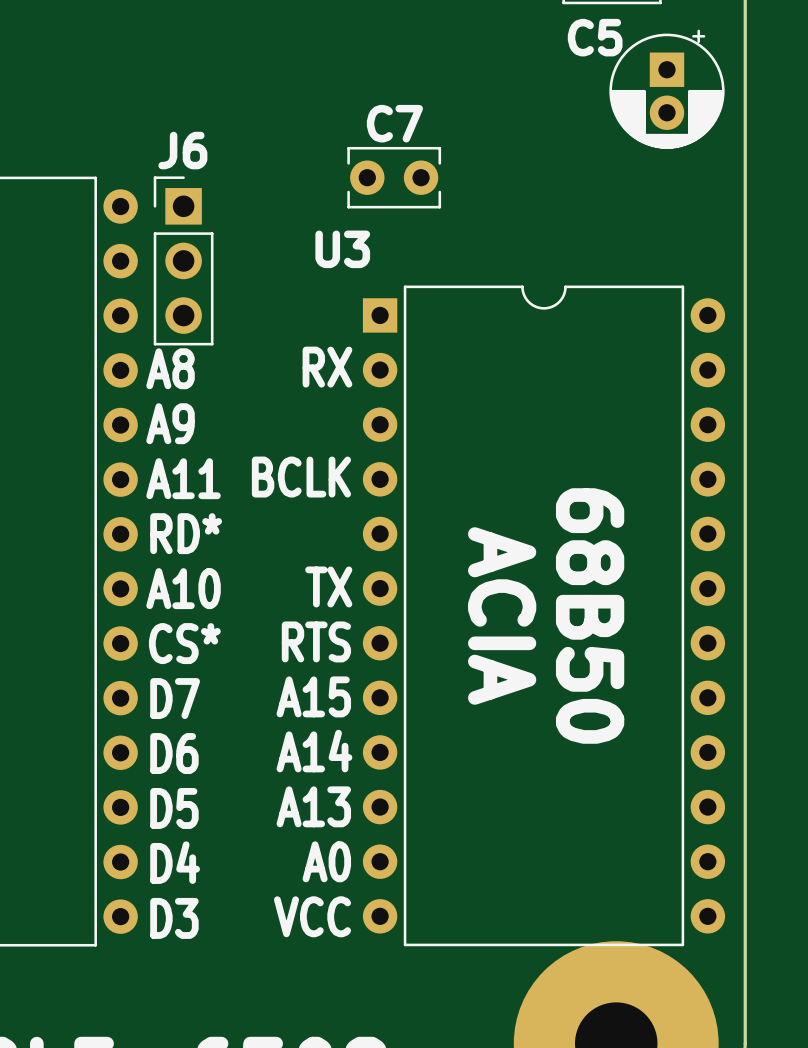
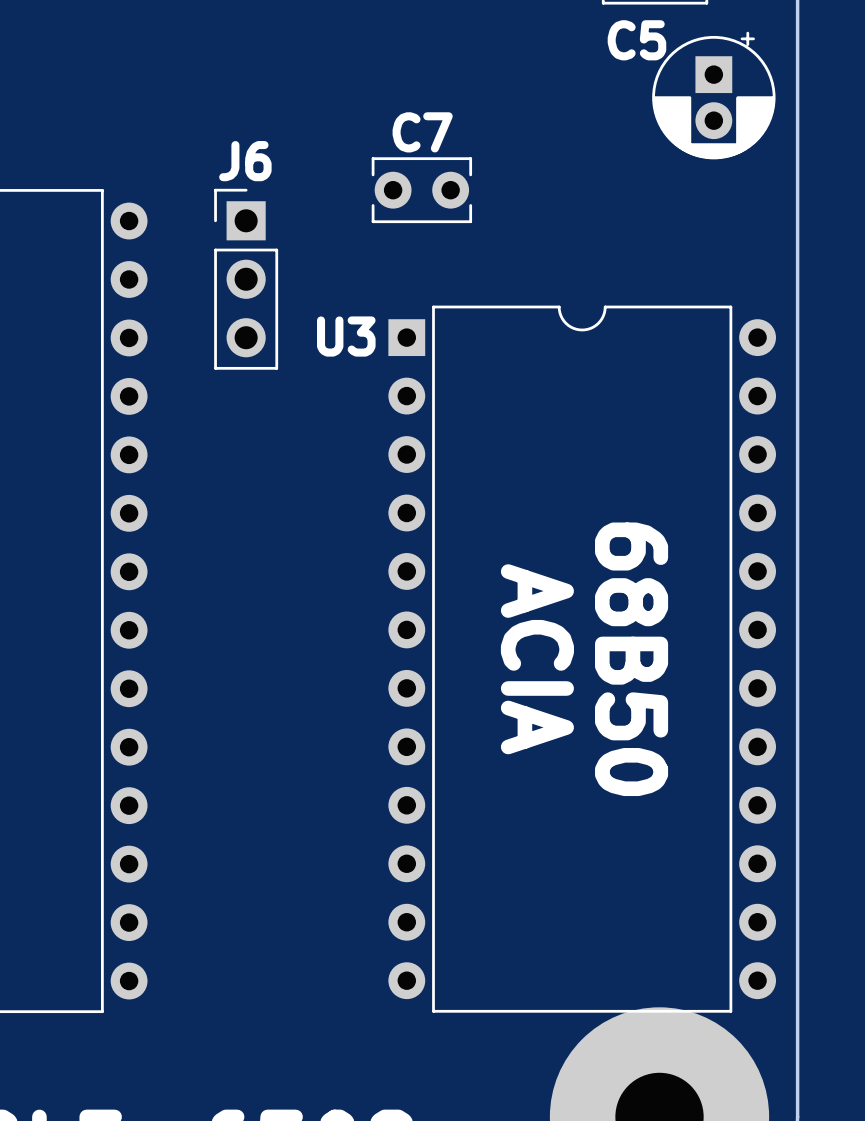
U3 name position: U3 (342, 249) -> U3 (346, 336)
J6 position: (183, 260) -> (246, 279)
text: RX (327, 367) -> none
text: A8 (170, 368) -> none
text: A9 (170, 423) -> none
text: BCLK (301, 477) -> none
text: A11 (183, 478) -> none
text: RD* (186, 533) -> none
text: TX (328, 586) -> none
text: A10 (183, 588) -> none
text: RTS (316, 641) -> none
text: CS* (184, 643) -> none
text: A15 (313, 696) -> none
text: D7 (175, 698) -> none
text: A14 (314, 751) -> none
text: D6 (174, 753) -> none
text: A13 (313, 806) -> none
text: D5 (174, 808) -> none
text: A0 (326, 861) -> none
text: D4 (175, 862) -> none
text: VCC (312, 916) -> none
text: D3 (174, 918) -> none

